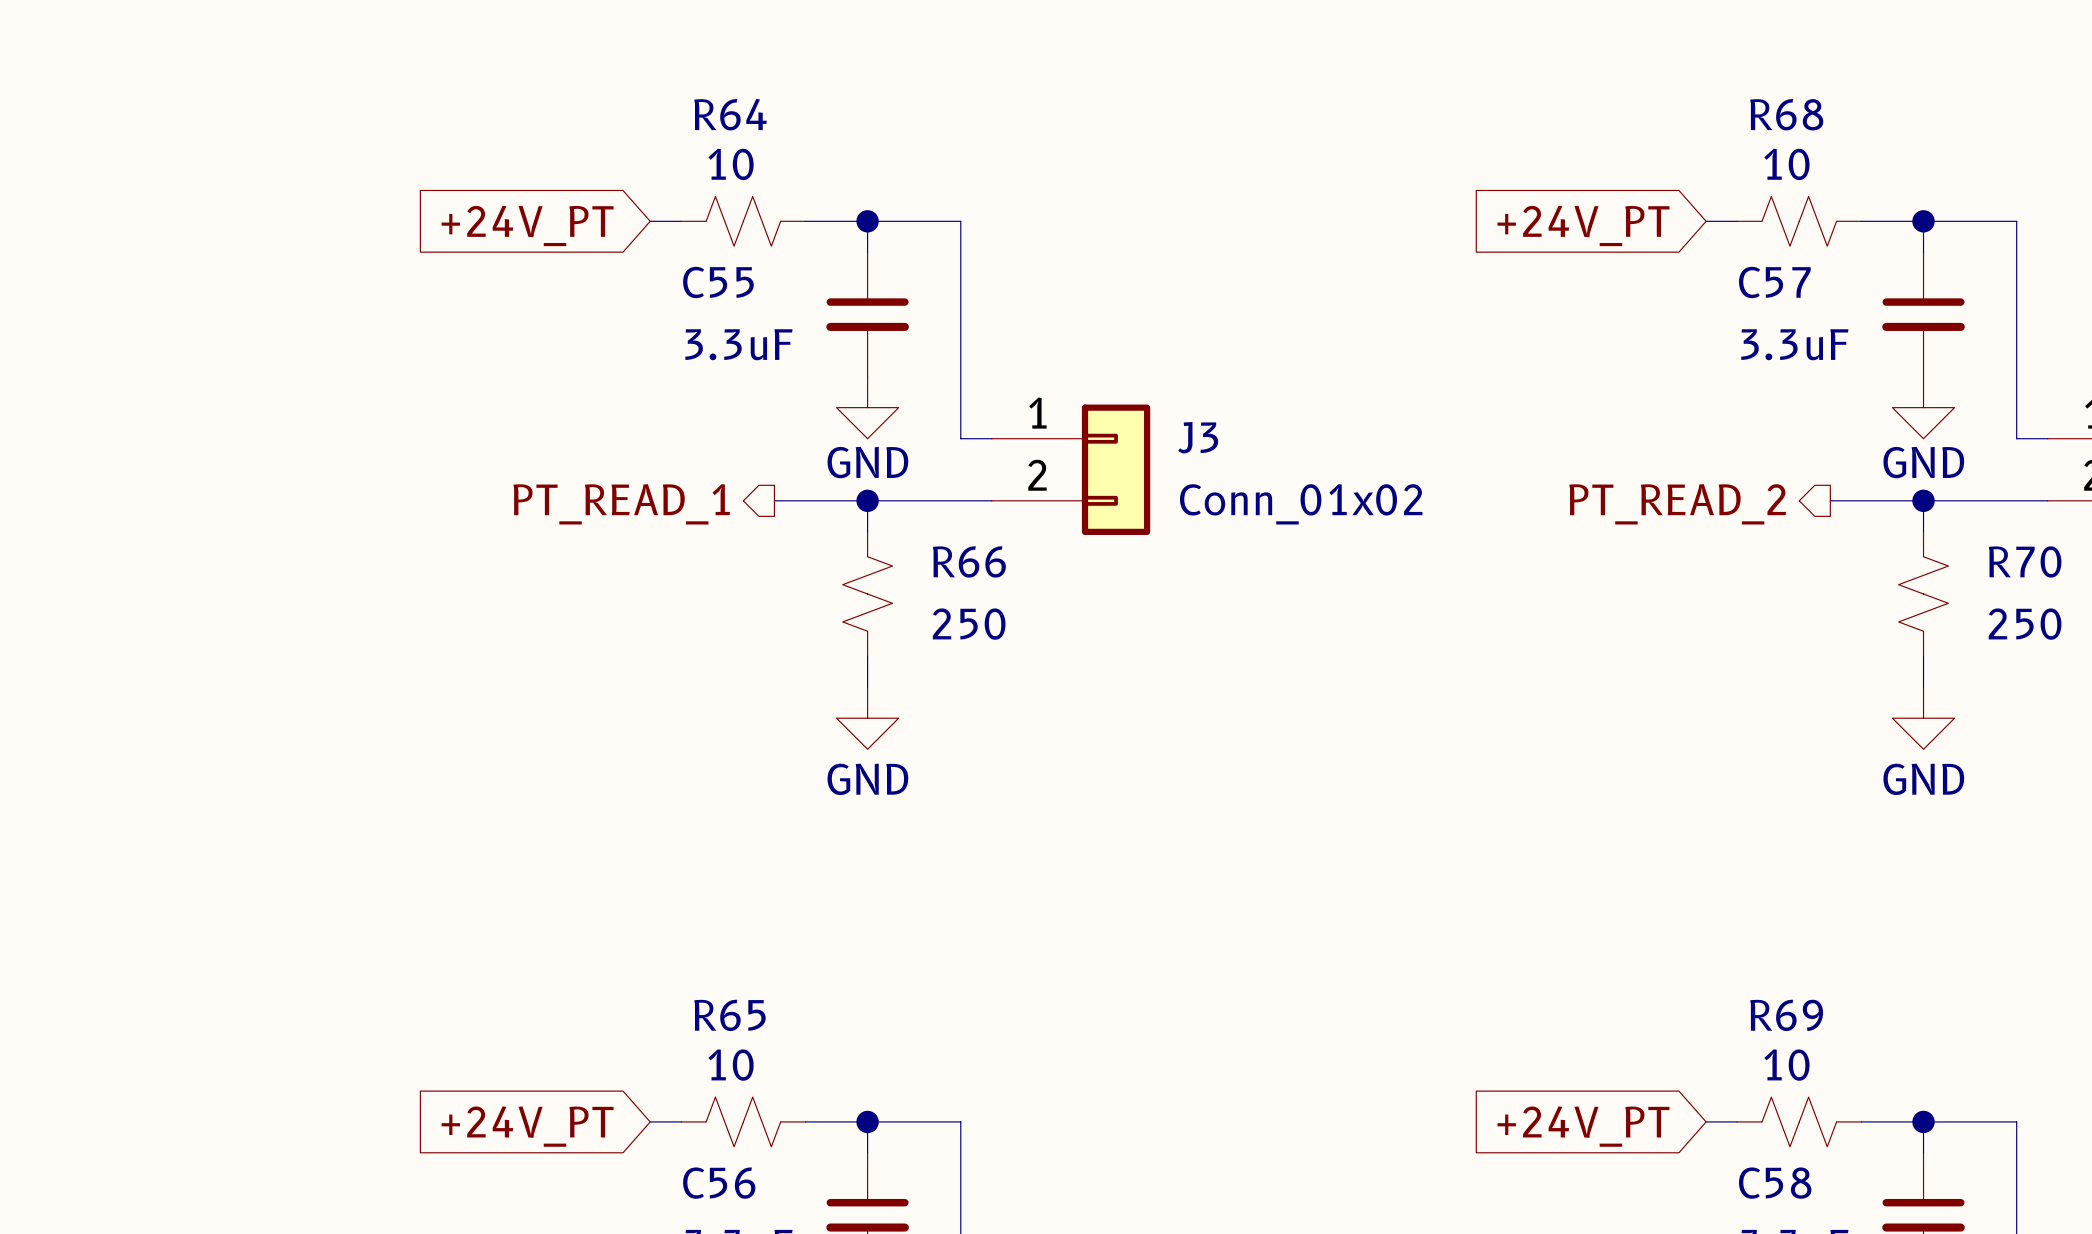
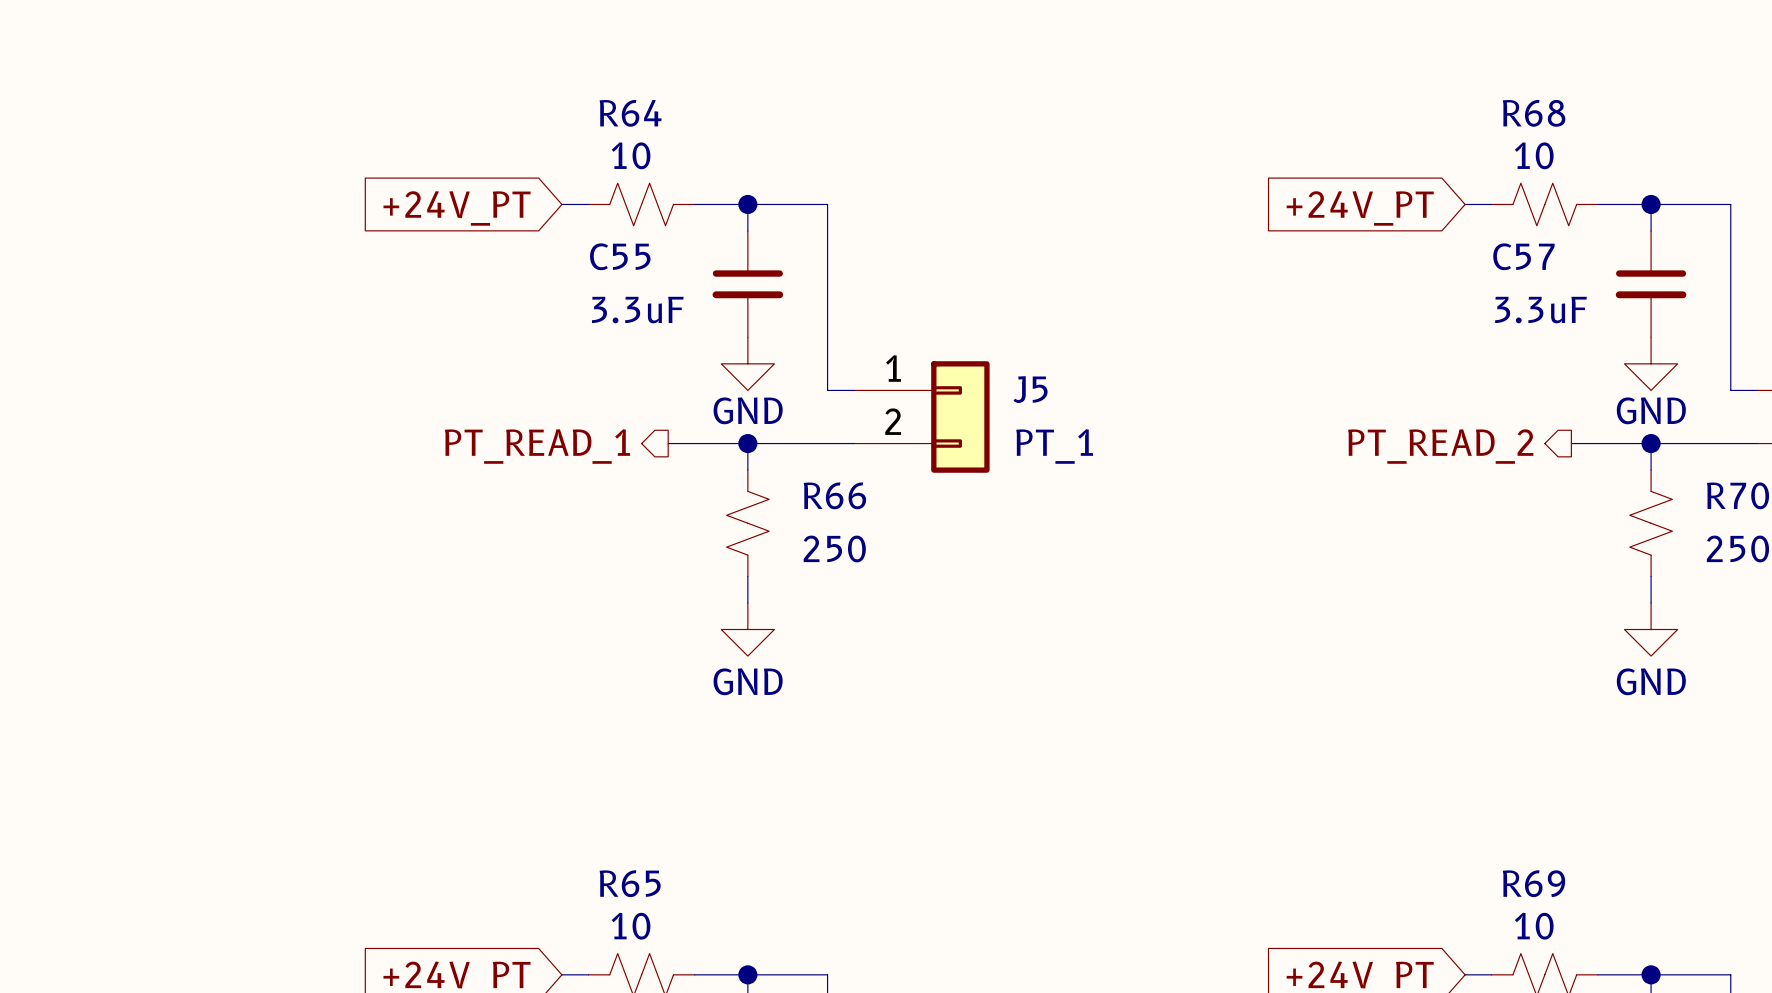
J3 name: J3 (1198, 437) -> J5 (1030, 389)
J3 value: Conn_01x02 (1301, 504) -> PT_1 (1054, 446)

